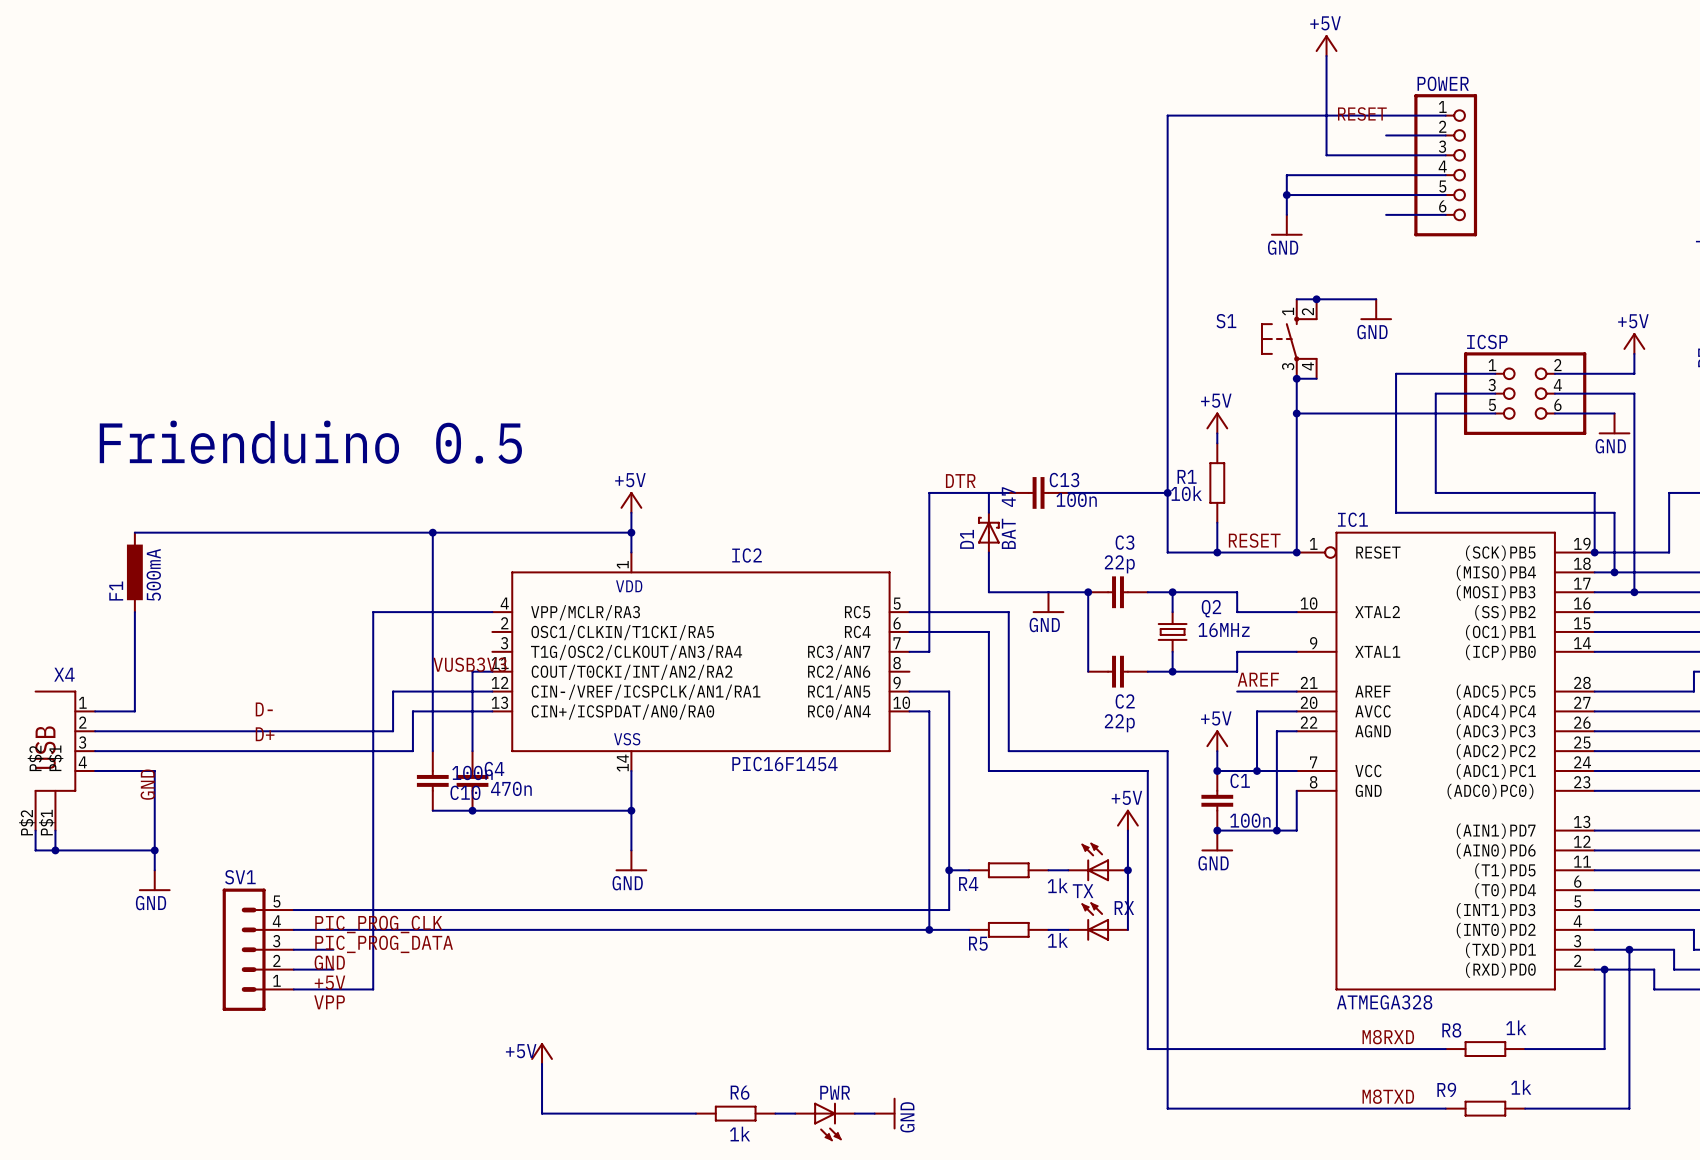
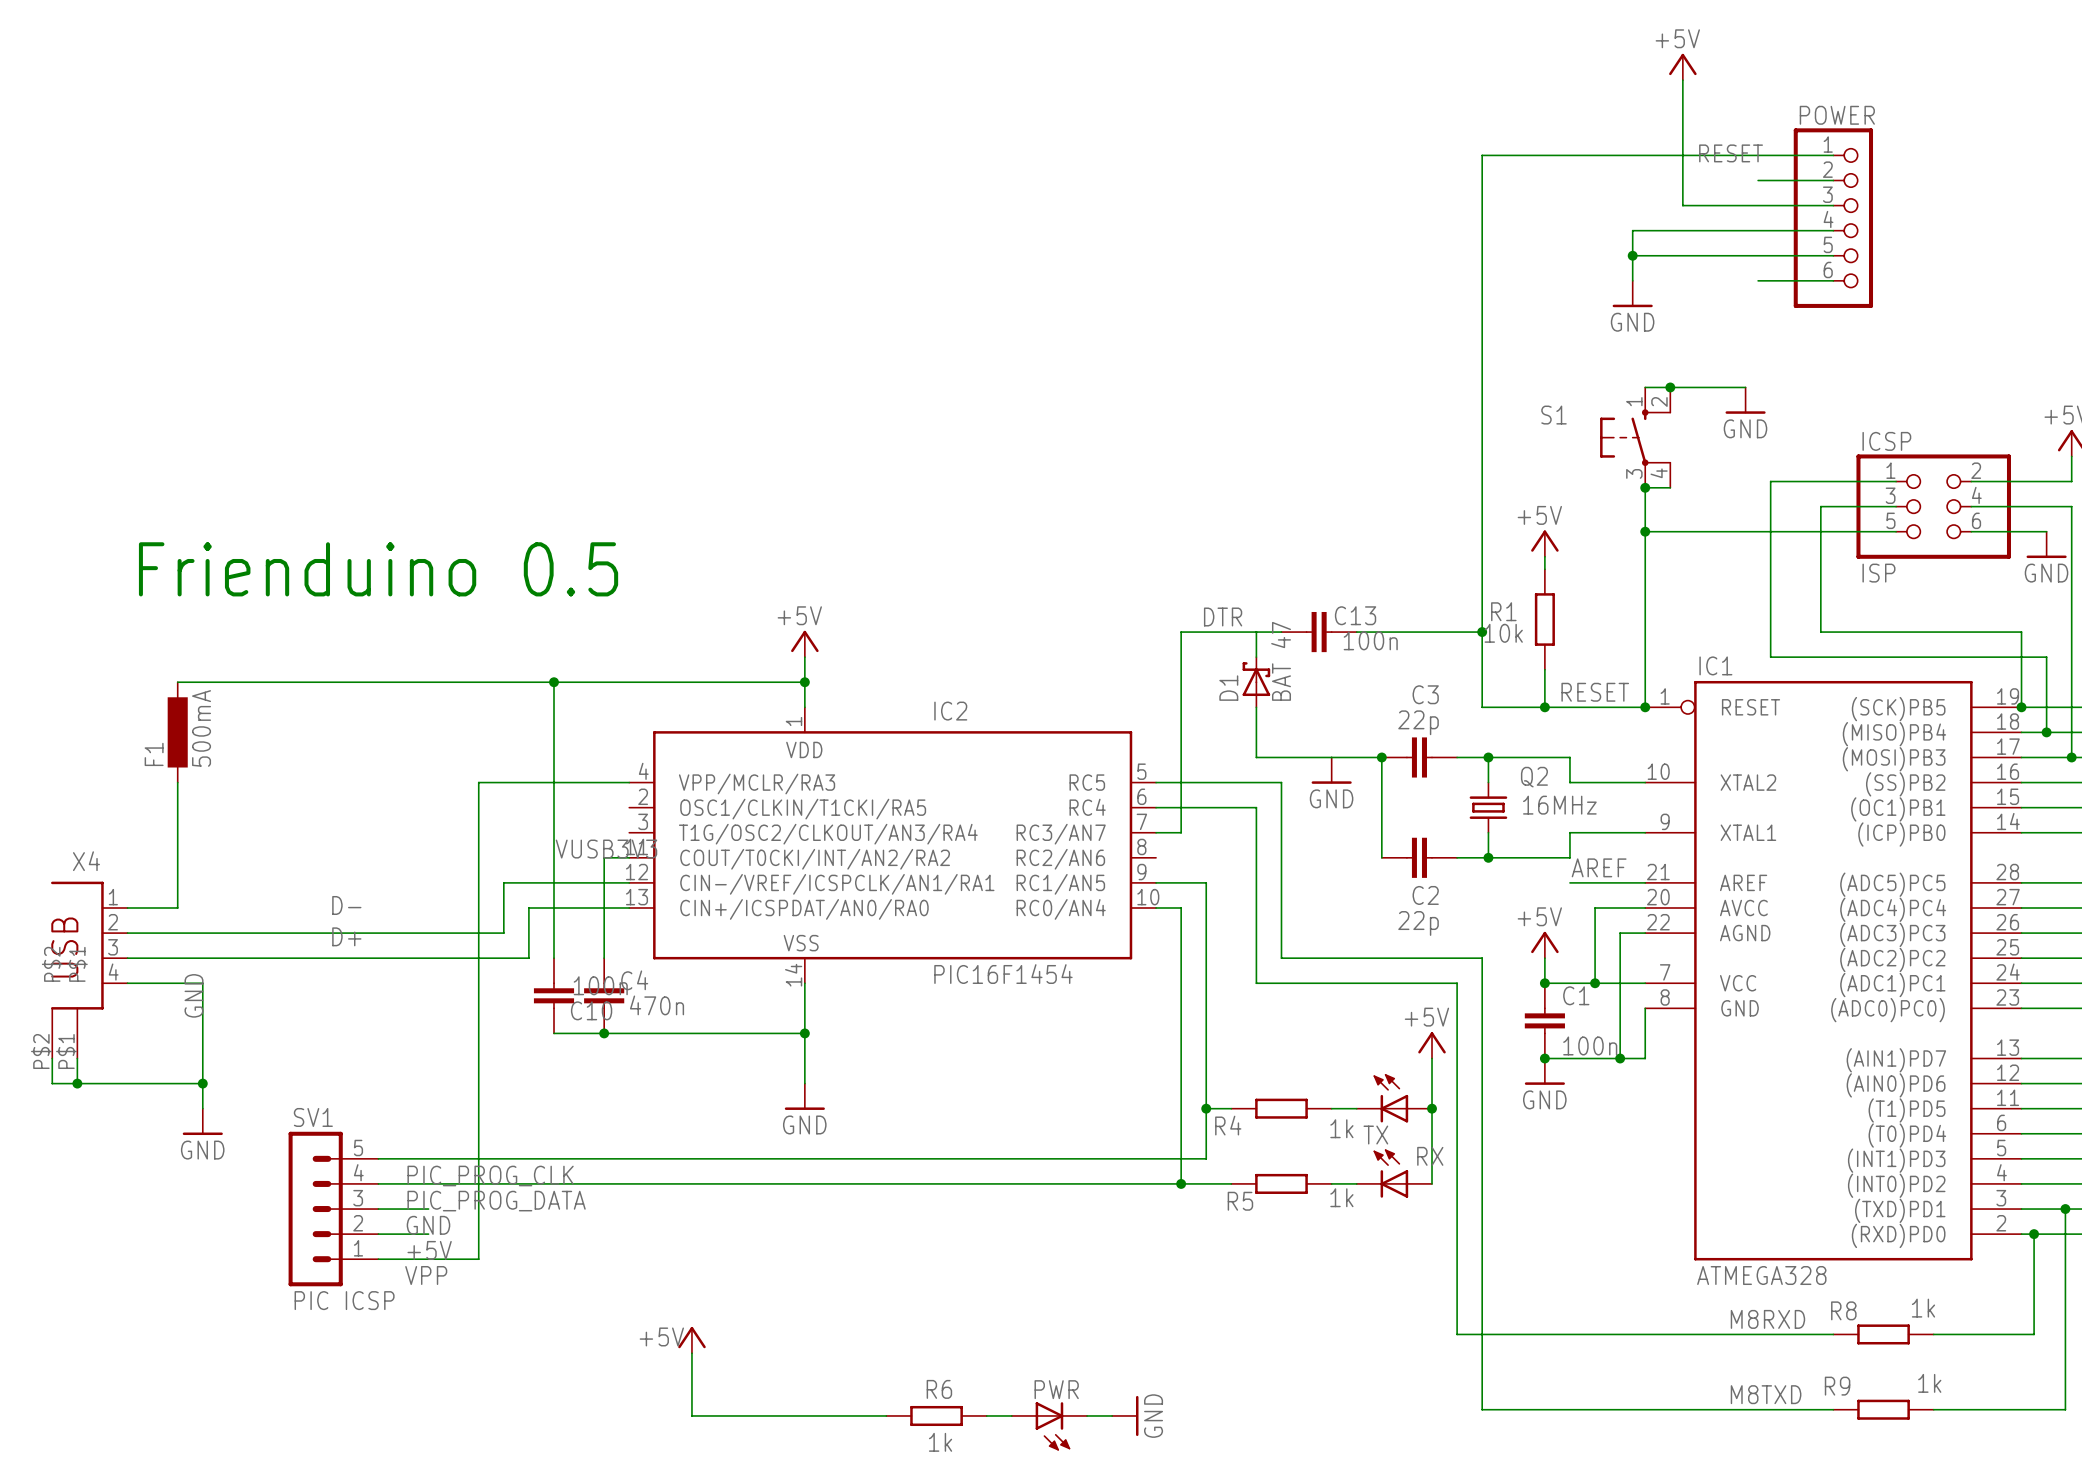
ICSP value: none -> ISP (1878, 573)
SV1 value: none -> PIC ICSP (344, 1300)

